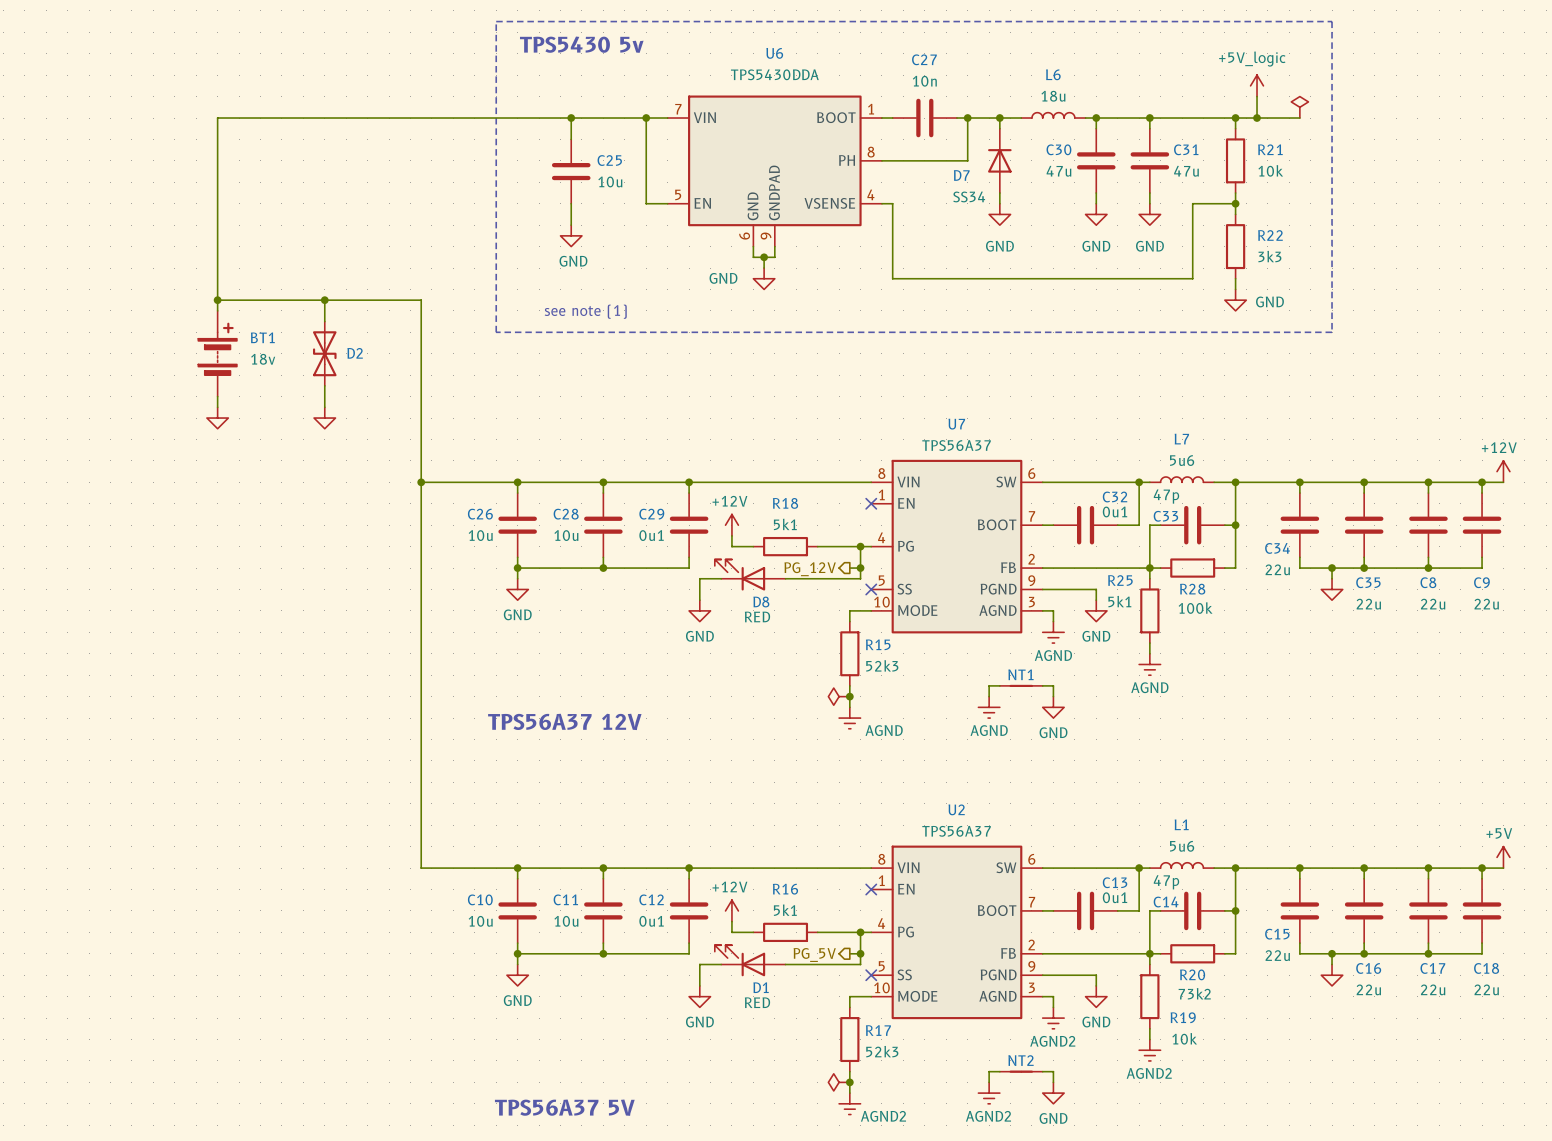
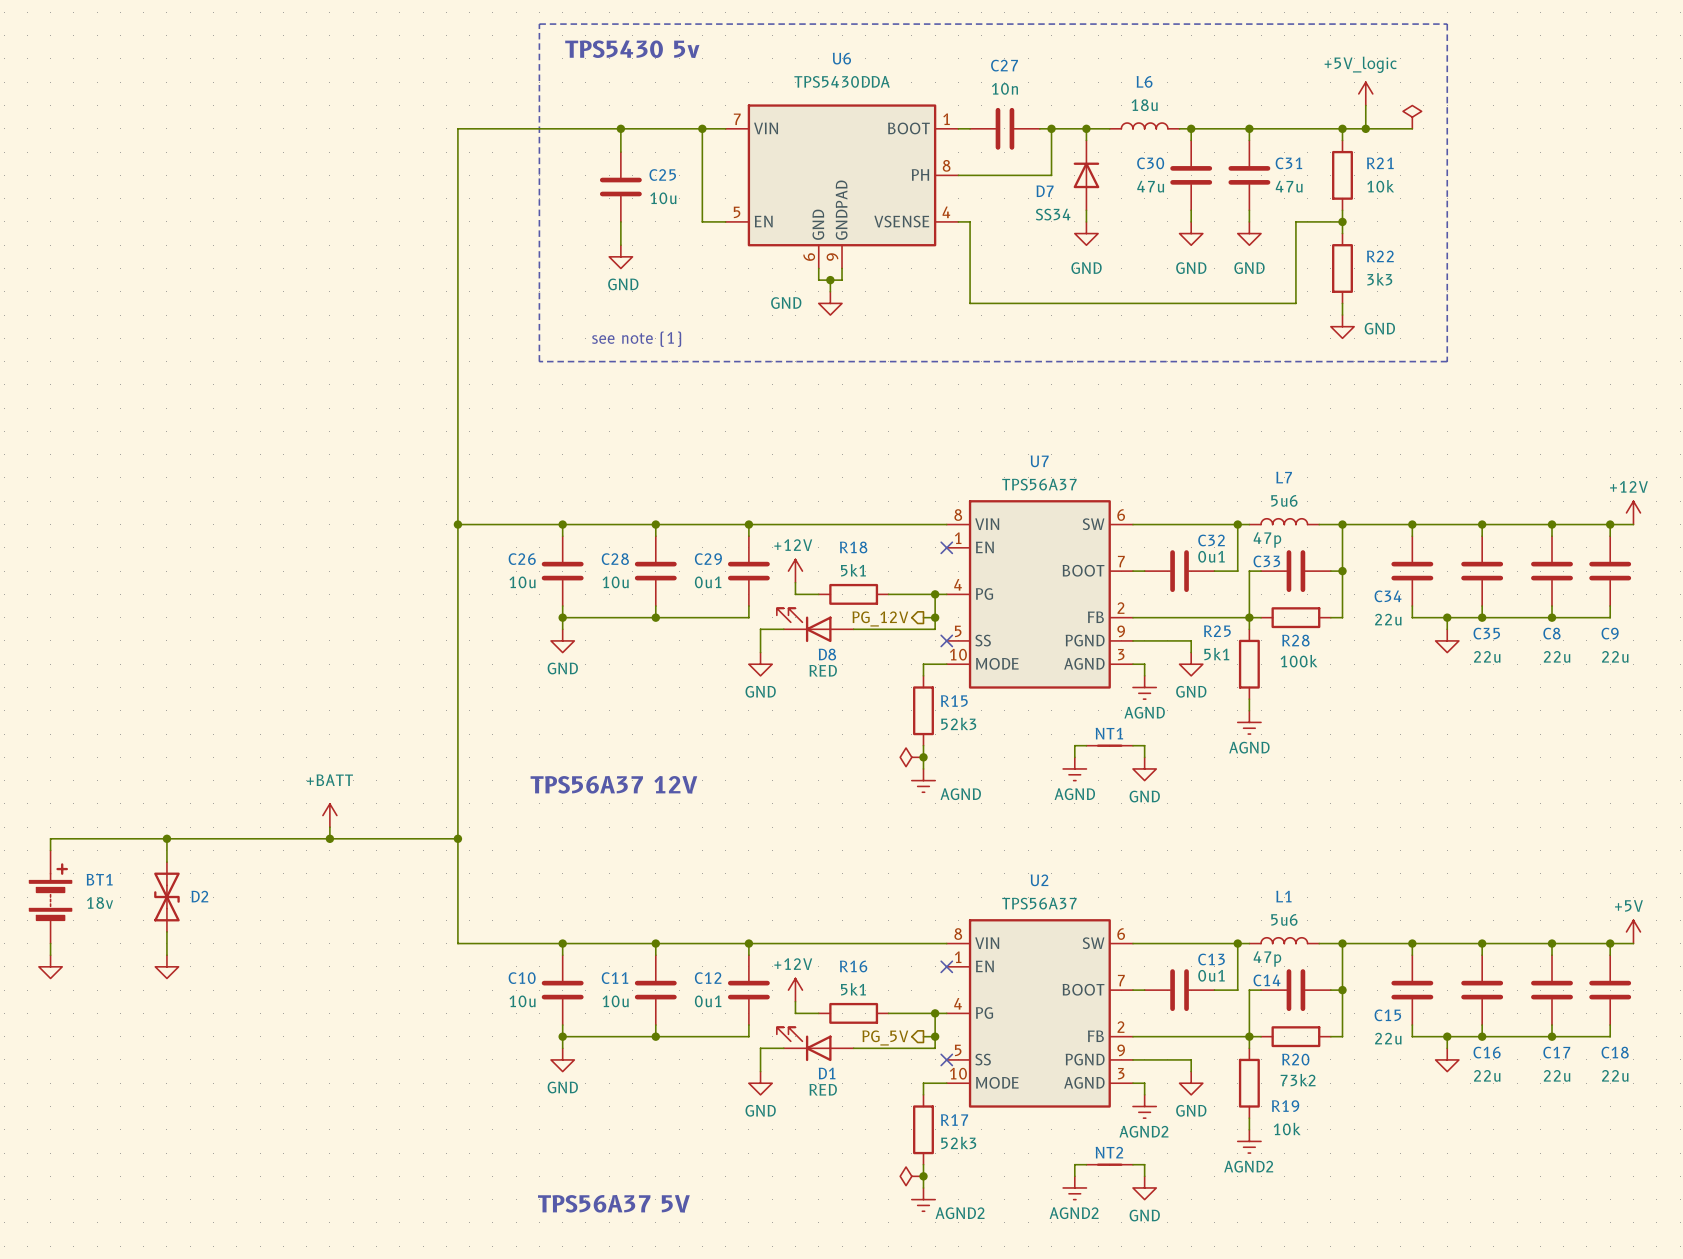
wire: (421, 118) (217, 118) (217, 310) -> (457, 128) (457, 326)
wire: (217, 300) (421, 300) -> none
junction: (217, 300) -> none
wire: (324, 300) (324, 321) -> none
junction: (324, 300) -> none
BT1 position: (217, 353) -> (50, 897)
D2 position: (324, 353) -> (166, 897)
wire: (324, 385) (324, 407) -> none
wire: (217, 396) (217, 407) -> none
power symbol: (217, 418) -> none
power symbol: (324, 418) -> none
power symbol: none -> +BATT (329, 815)
wire: none -> (329, 827) (329, 838)
wire: none -> (166, 838) (166, 862)
junction: none -> (166, 838)
junction: none -> (329, 838)
wire: none -> (457, 838) (50, 838) (50, 850)
junction: none -> (457, 838)
wire: none -> (166, 931) (166, 955)
wire: none -> (50, 943) (50, 955)
power symbol: none -> (50, 966)
power symbol: none -> (166, 966)

